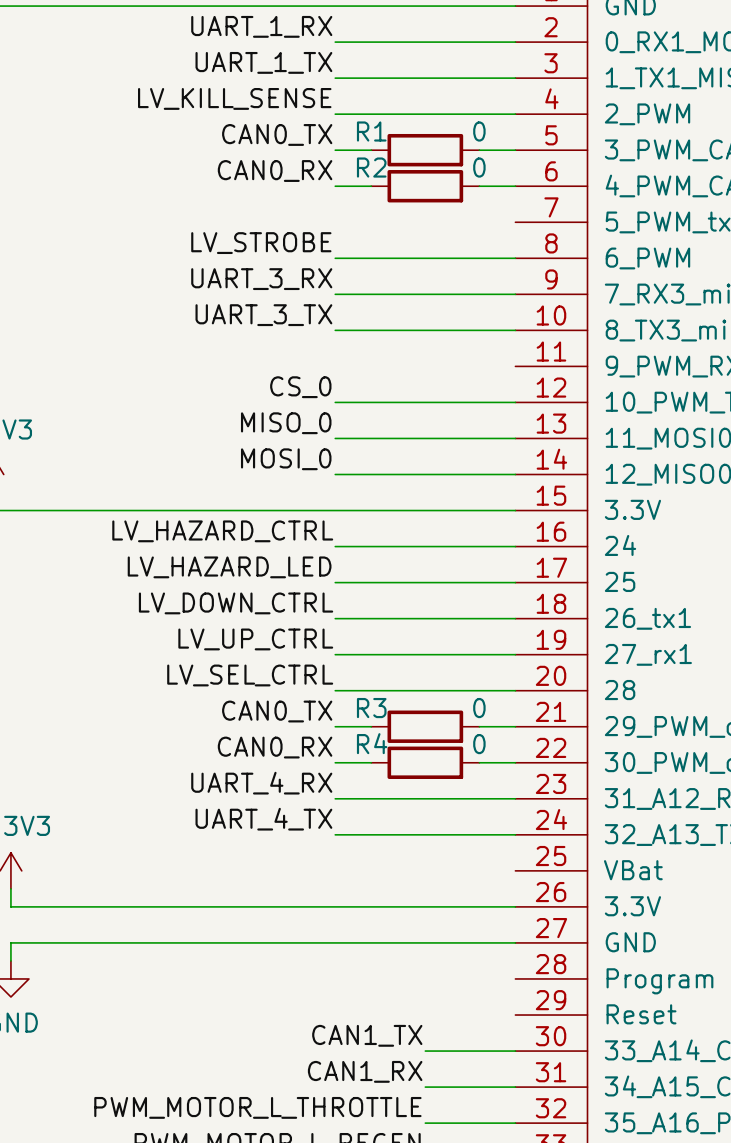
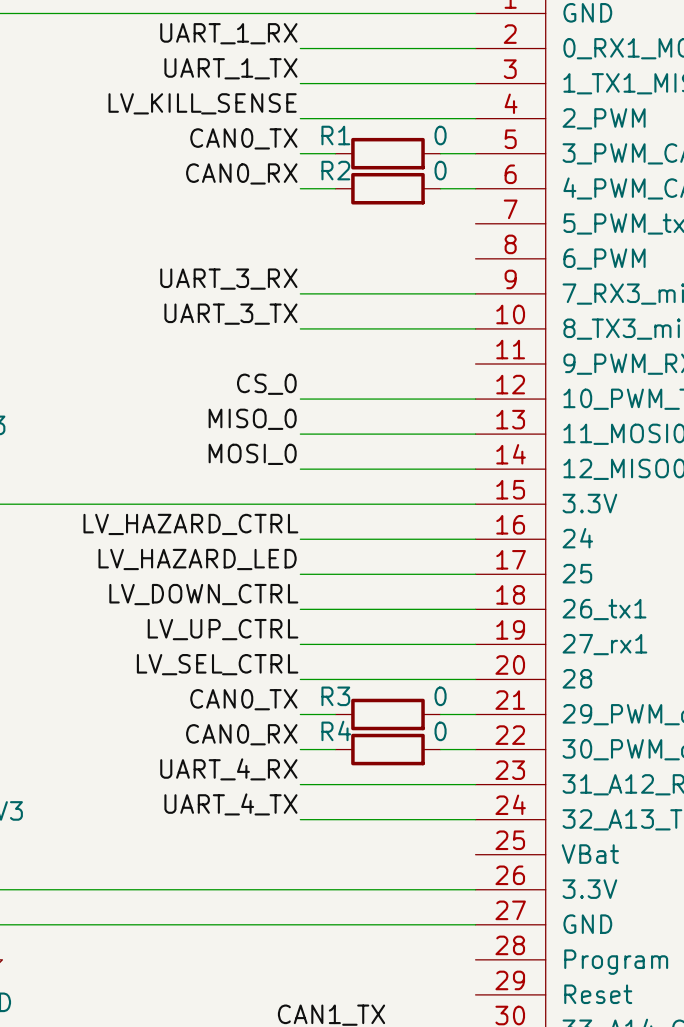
label: LV_STROBE (261, 243) -> none
wire: (335, 258) (515, 258) -> none

